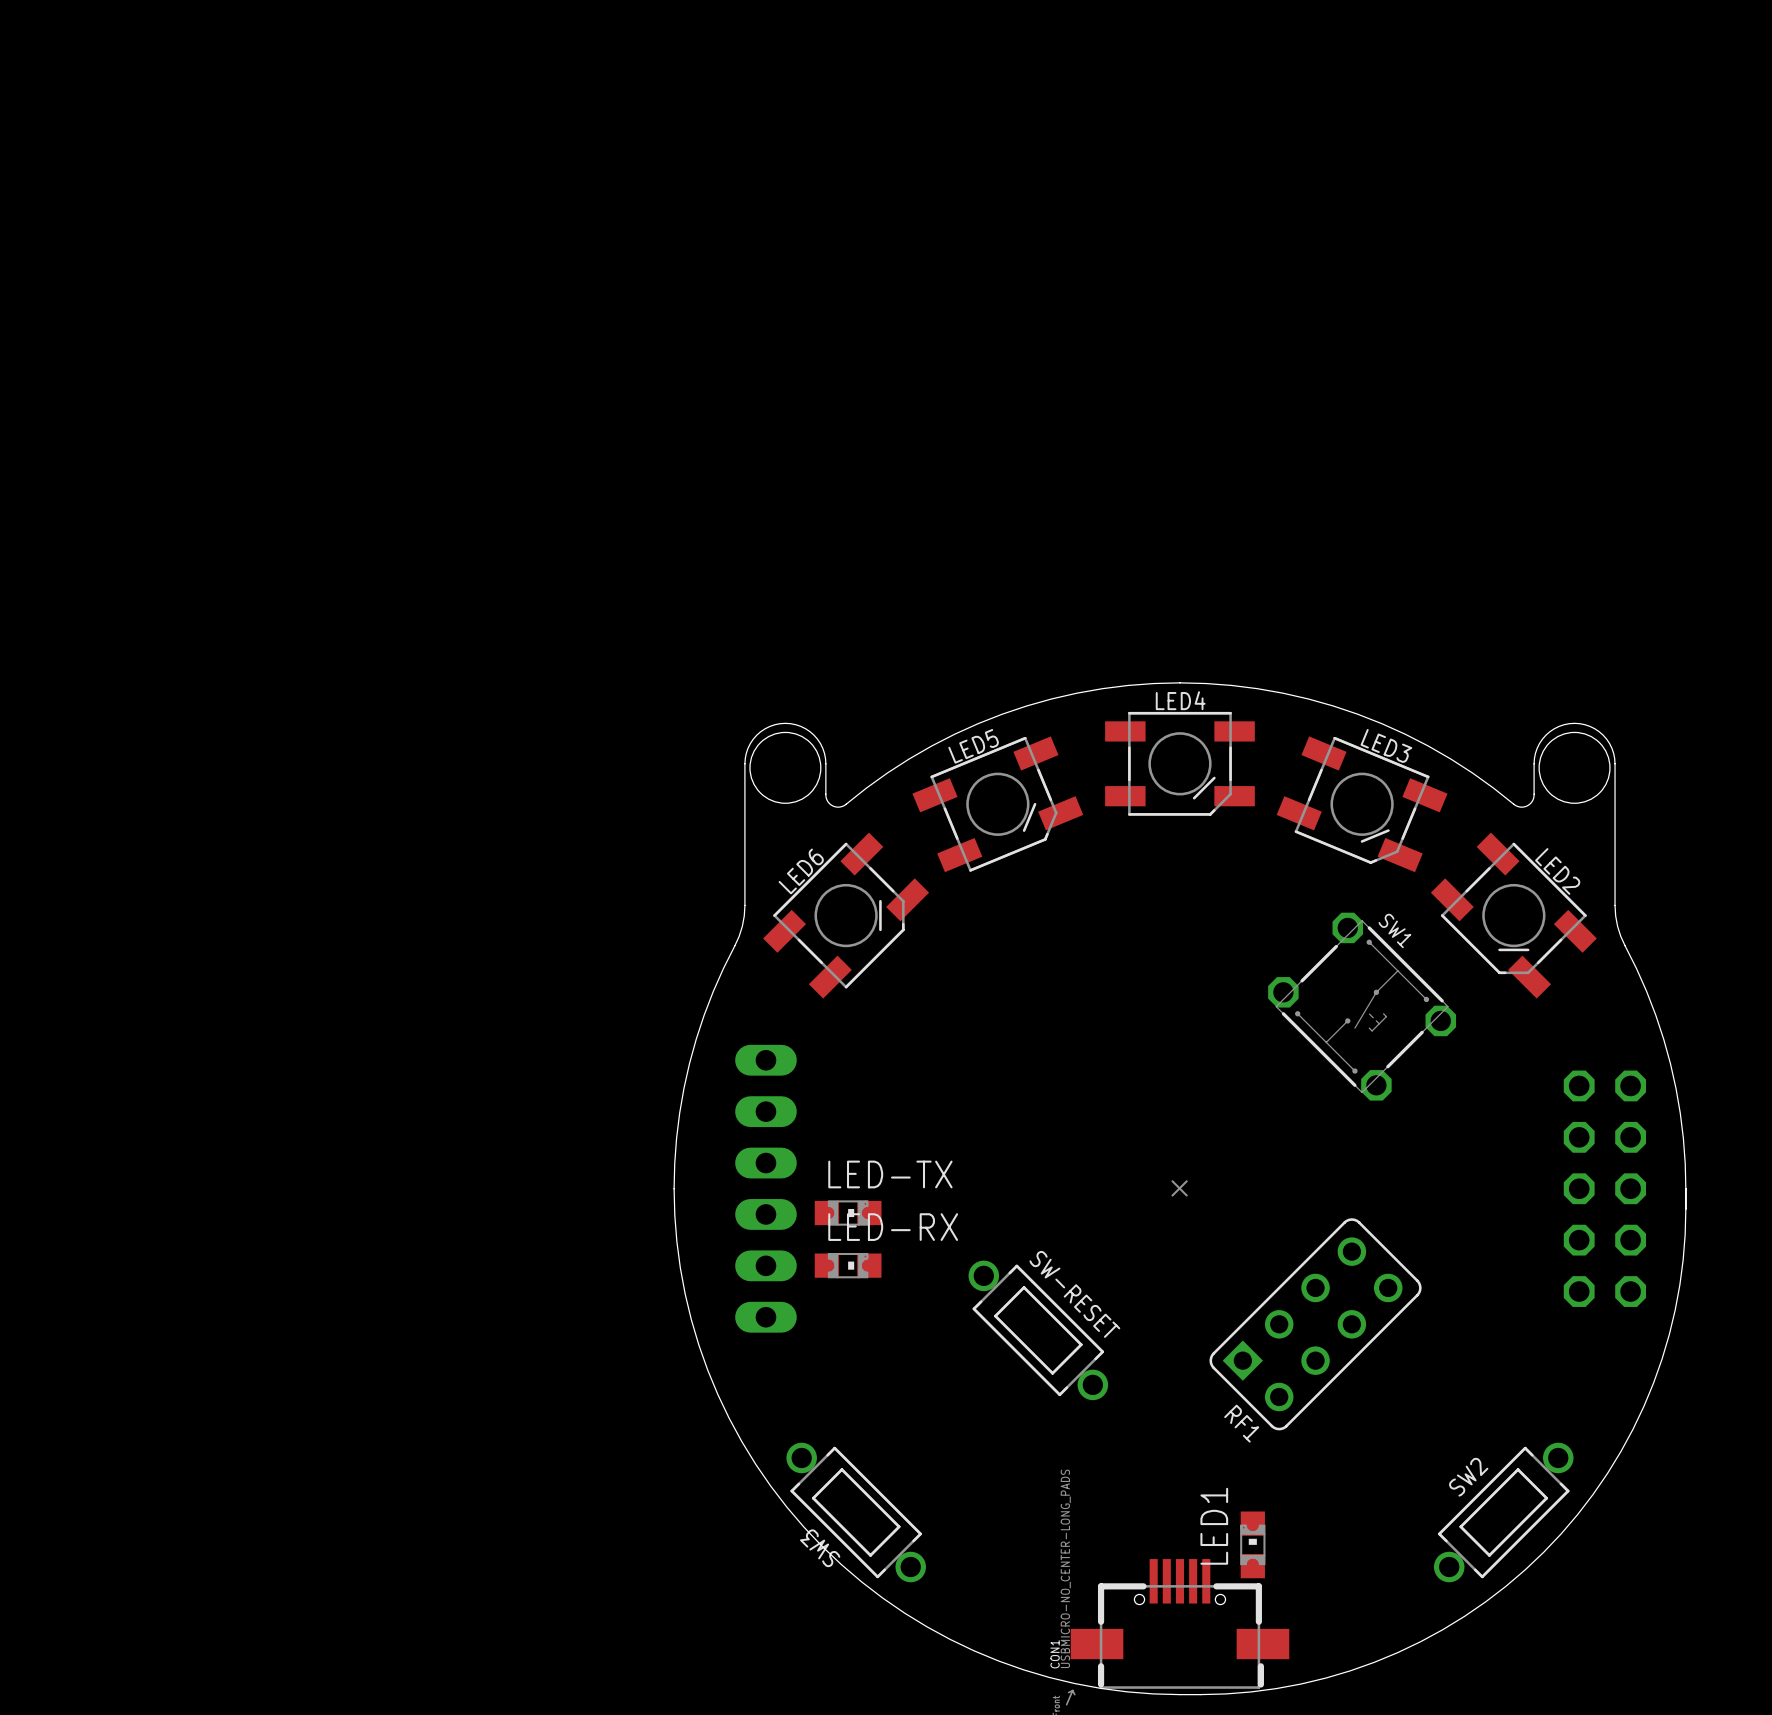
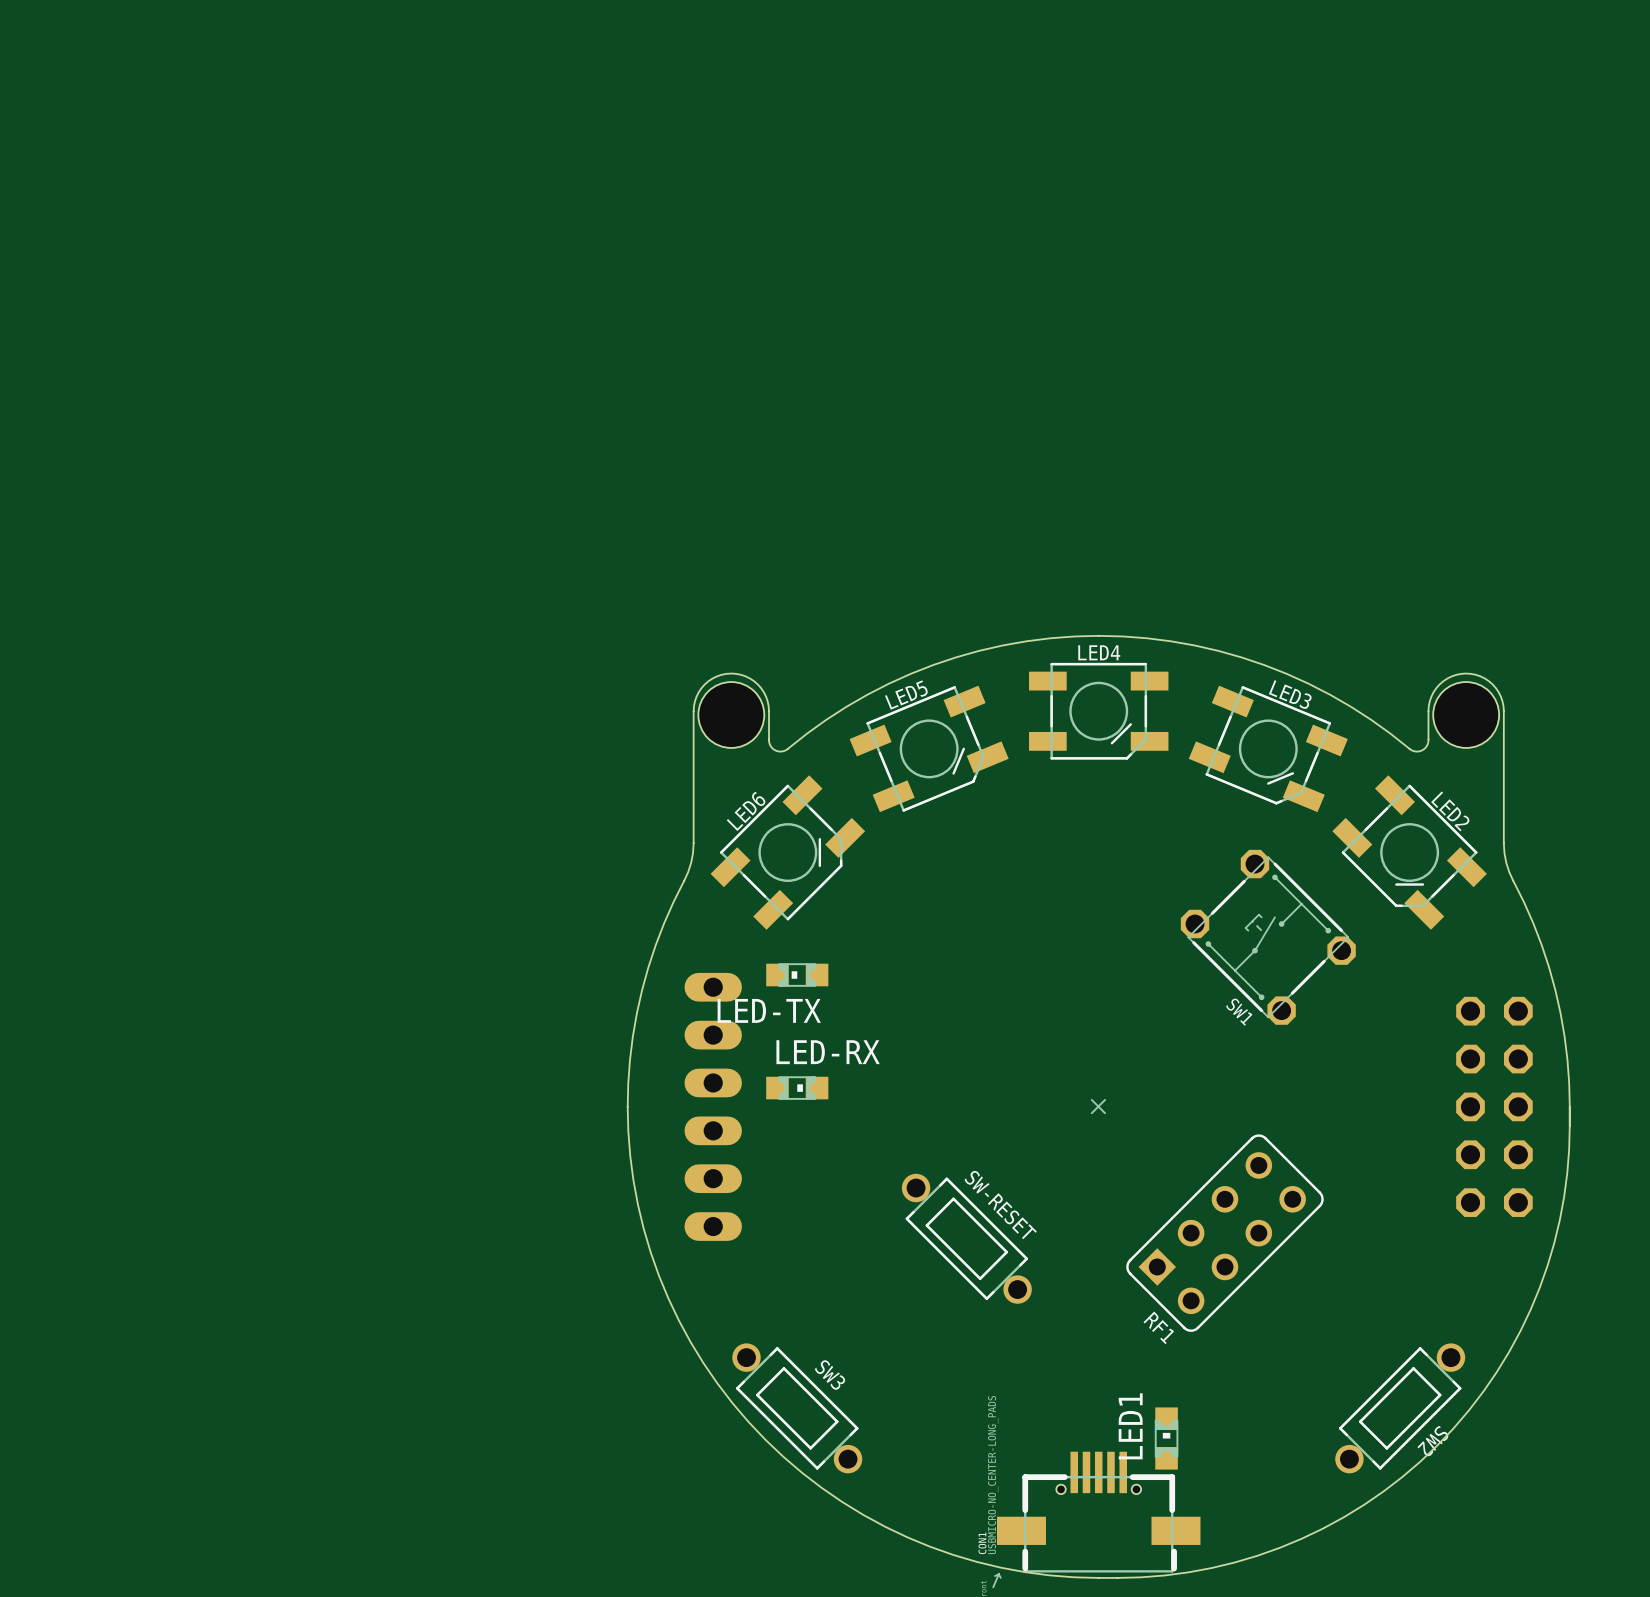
SW1 rotation: 0° (1362, 1006) -> 180° (1268, 937)
LED-TX rotation: 0° (848, 1213) -> 180° (797, 975)
LED-TX position: (848, 1213) -> (797, 975)
LED-RX position: (848, 1265) -> (797, 1088)
SW2 name rotation: 0° (1468, 1477) -> 180° (1432, 1441)
SW2 name position: SW2 (1468, 1477) -> SW2 (1432, 1441)
SW3 name rotation: 0° (820, 1548) -> 180° (830, 1375)
SW3 name position: SW3 (820, 1548) -> SW3 (830, 1375)

